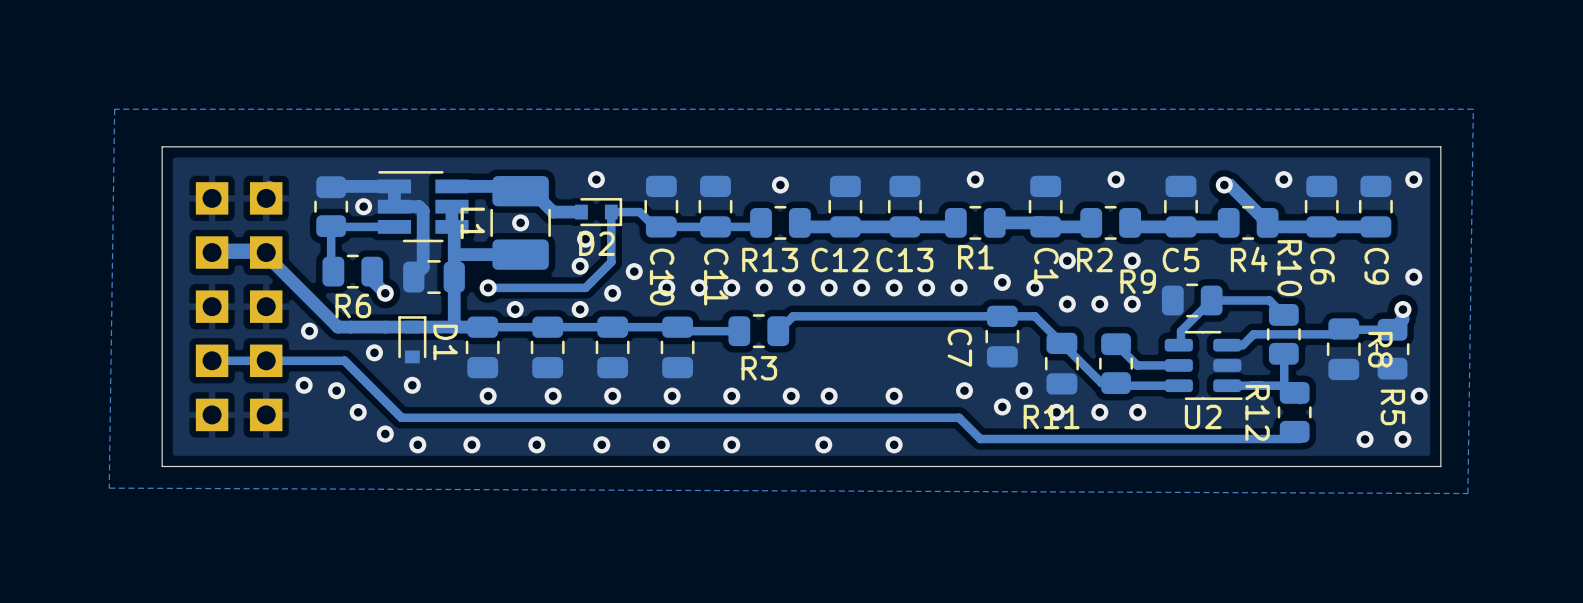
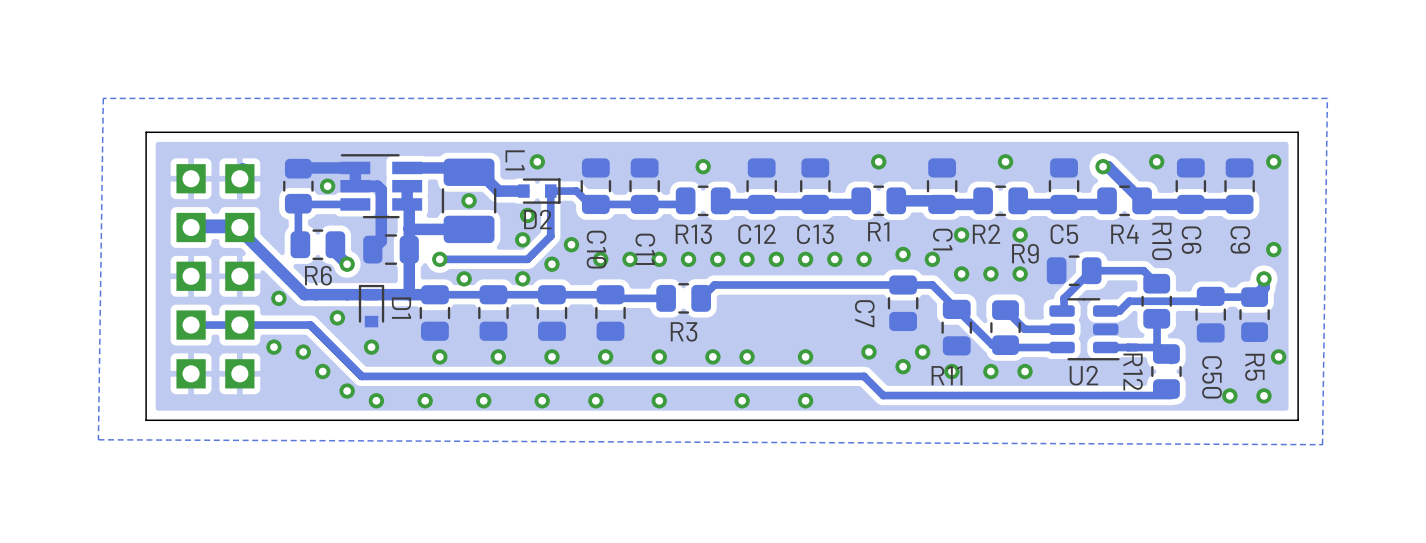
L1 name position: L1 (472, 223) -> L1 (515, 160)
R8 name: R8 (1380, 349) -> C50 (1212, 377)

